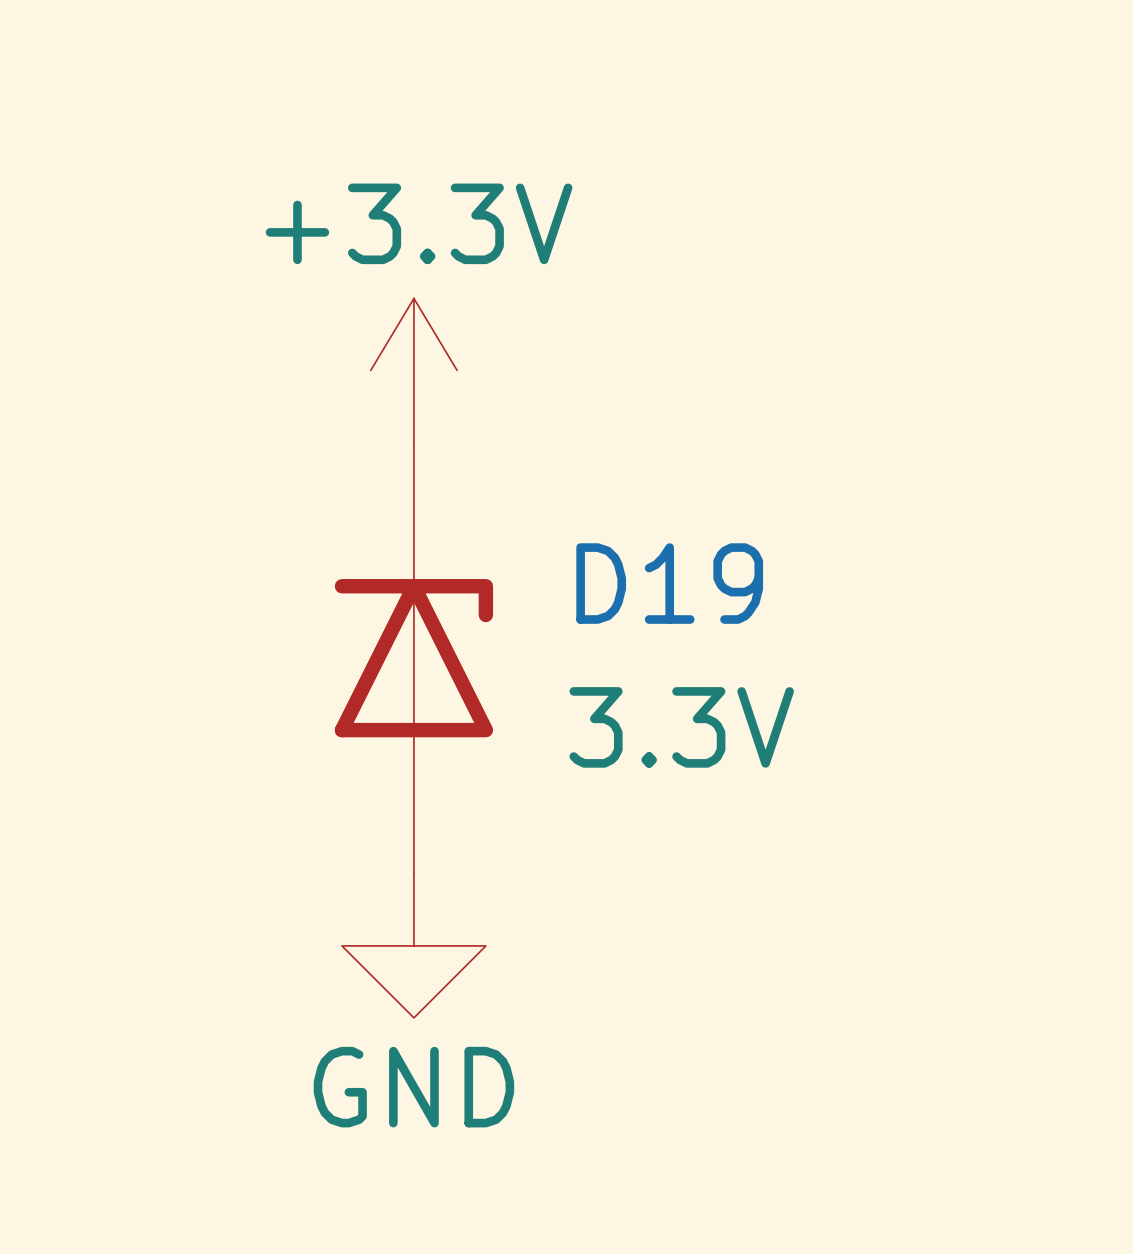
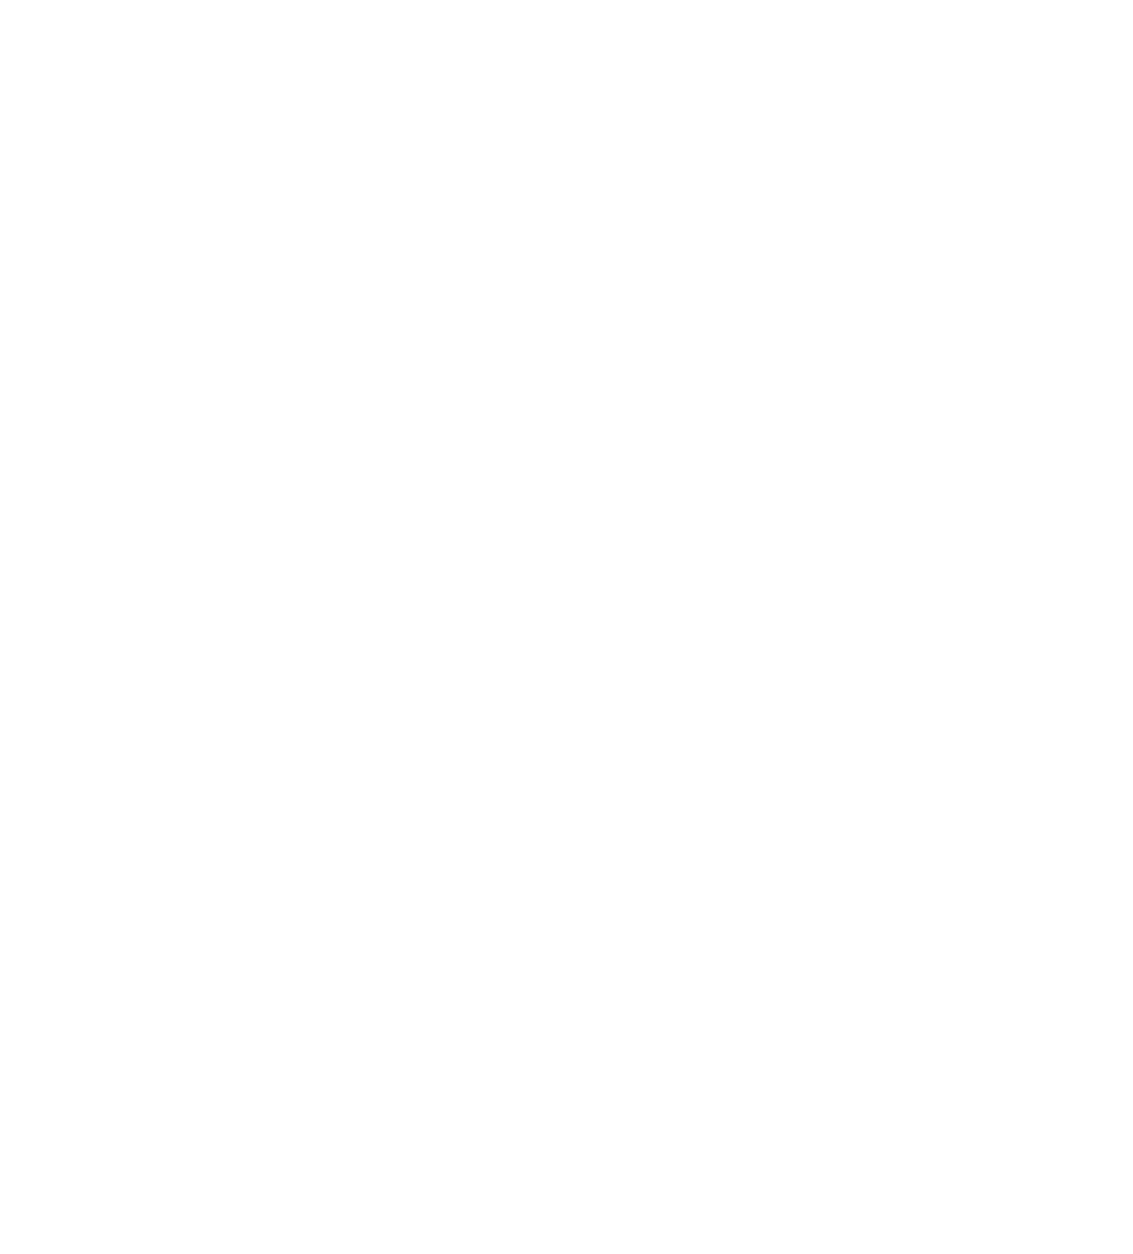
power symbol: +3.3V (413, 370) -> none
D19: 3.3V (413, 658) -> none
power symbol: GND (413, 945) -> none

